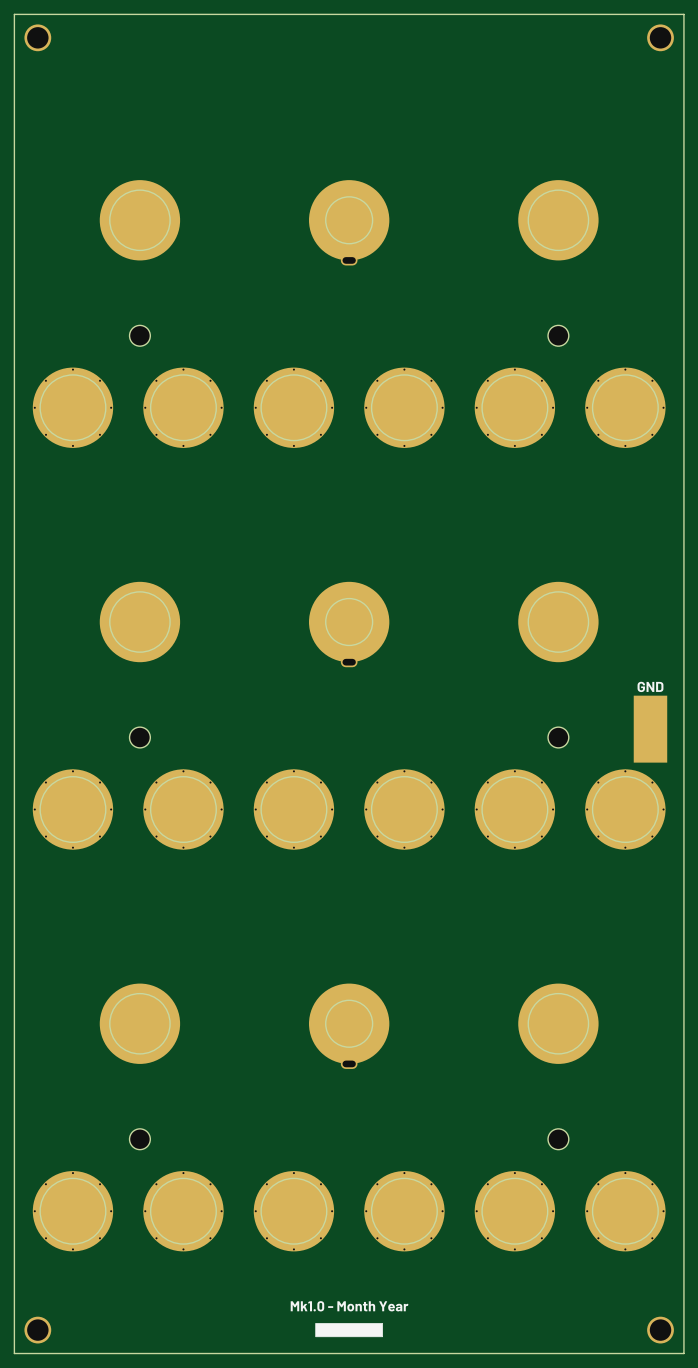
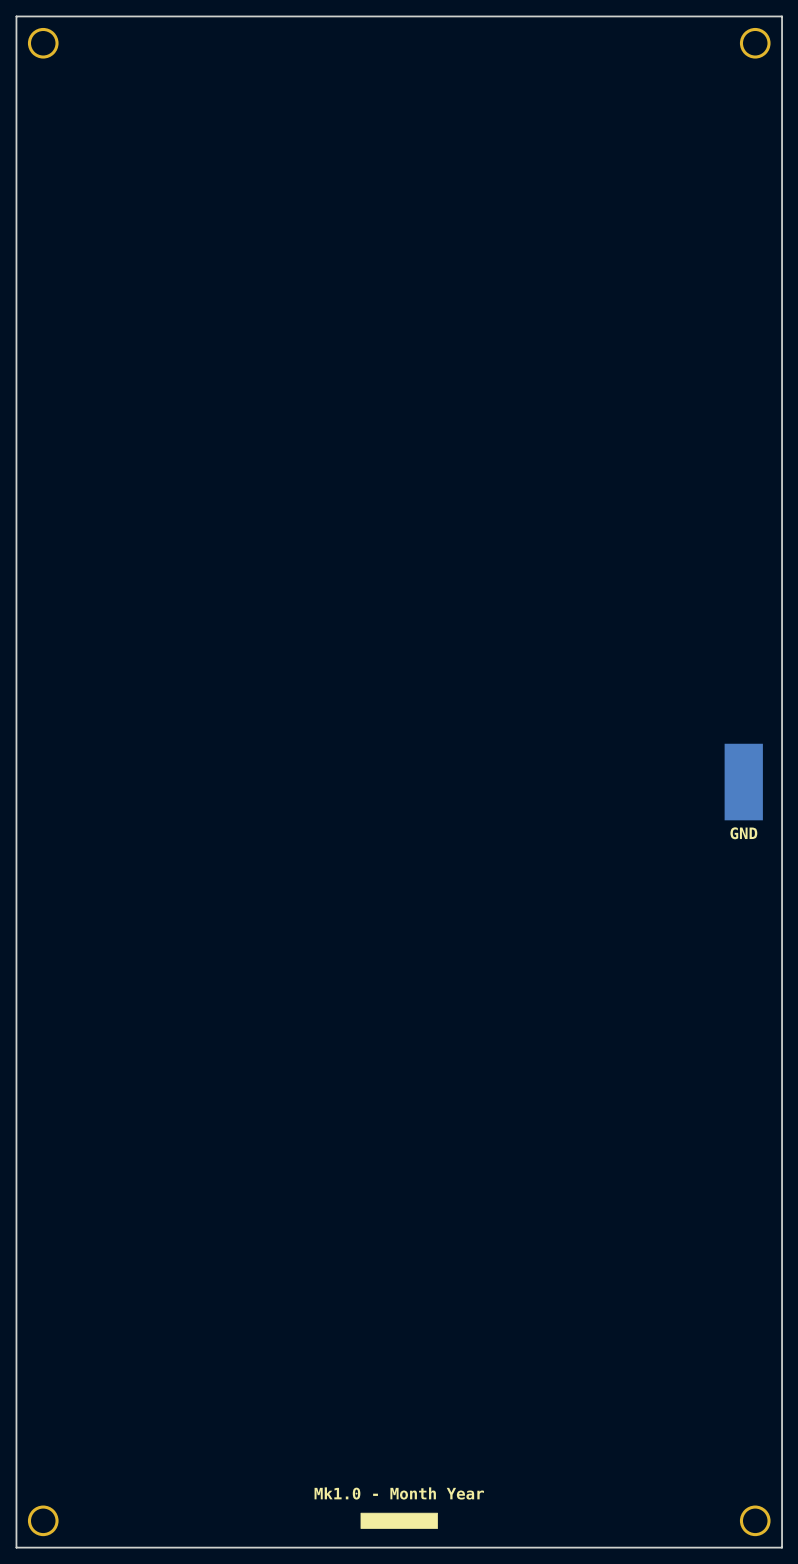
part: (139, 220) -> none
part: (558, 220) -> none
part: (349, 222) -> none
part: (139, 335) -> none
part: (558, 335) -> none
part: (72, 407) -> none
part: (183, 407) -> none
part: (293, 407) -> none
part: (404, 407) -> none
part: (514, 407) -> none
part: (625, 407) -> none
part: (139, 622) -> none
part: (558, 622) -> none
part: (349, 624) -> none
part text position: GND (650, 686) -> GND (743, 833)
part position: (650, 729) -> (743, 782)
part: (139, 737) -> none
part: (558, 737) -> none
part: (72, 809) -> none
part: (183, 809) -> none
part: (293, 809) -> none
part: (404, 809) -> none
part: (514, 809) -> none
part: (625, 809) -> none
part: (139, 1023) -> none
part: (558, 1023) -> none
part: (349, 1026) -> none
part: (139, 1139) -> none
part: (558, 1139) -> none
part: (72, 1211) -> none
part: (183, 1211) -> none
part: (293, 1211) -> none
part: (404, 1211) -> none
part: (514, 1211) -> none
part: (625, 1211) -> none

